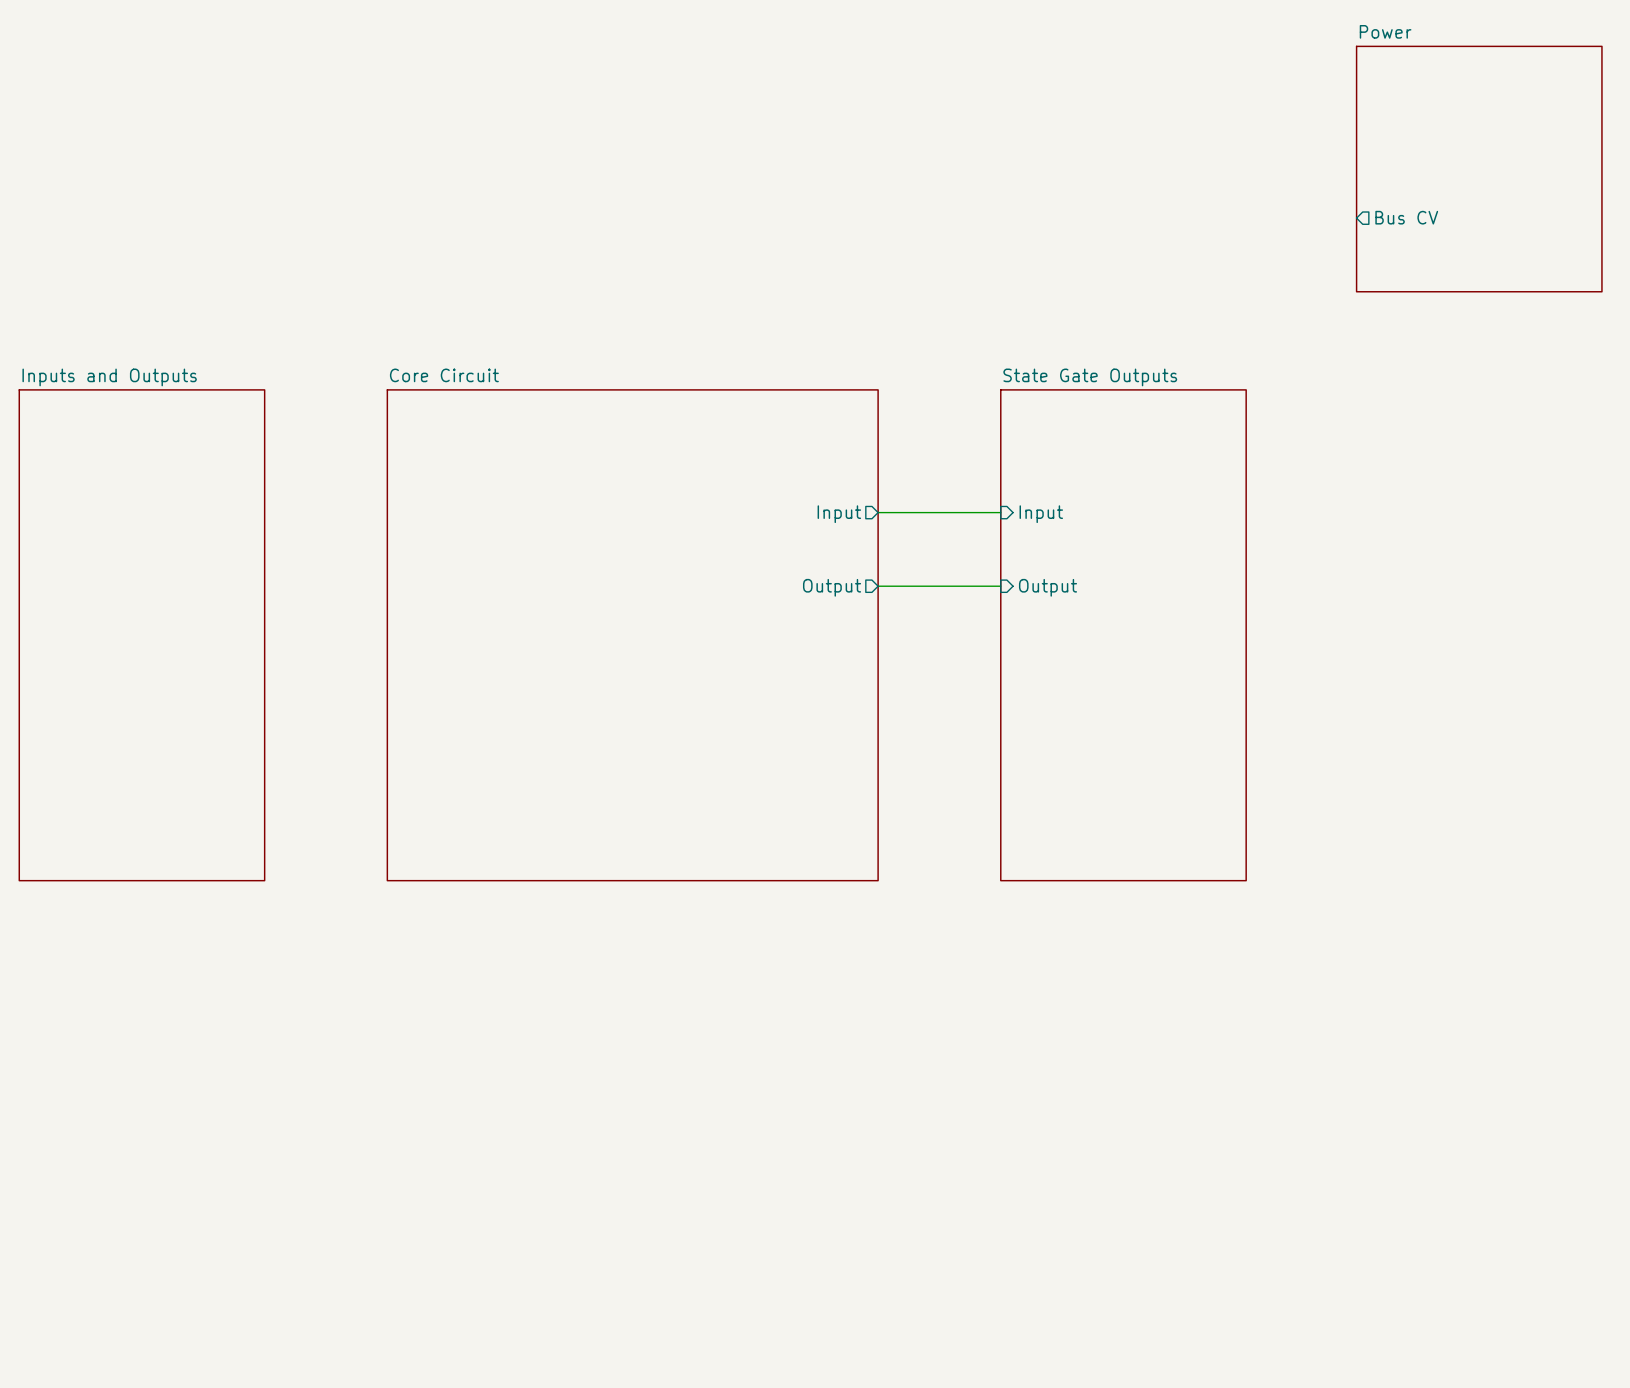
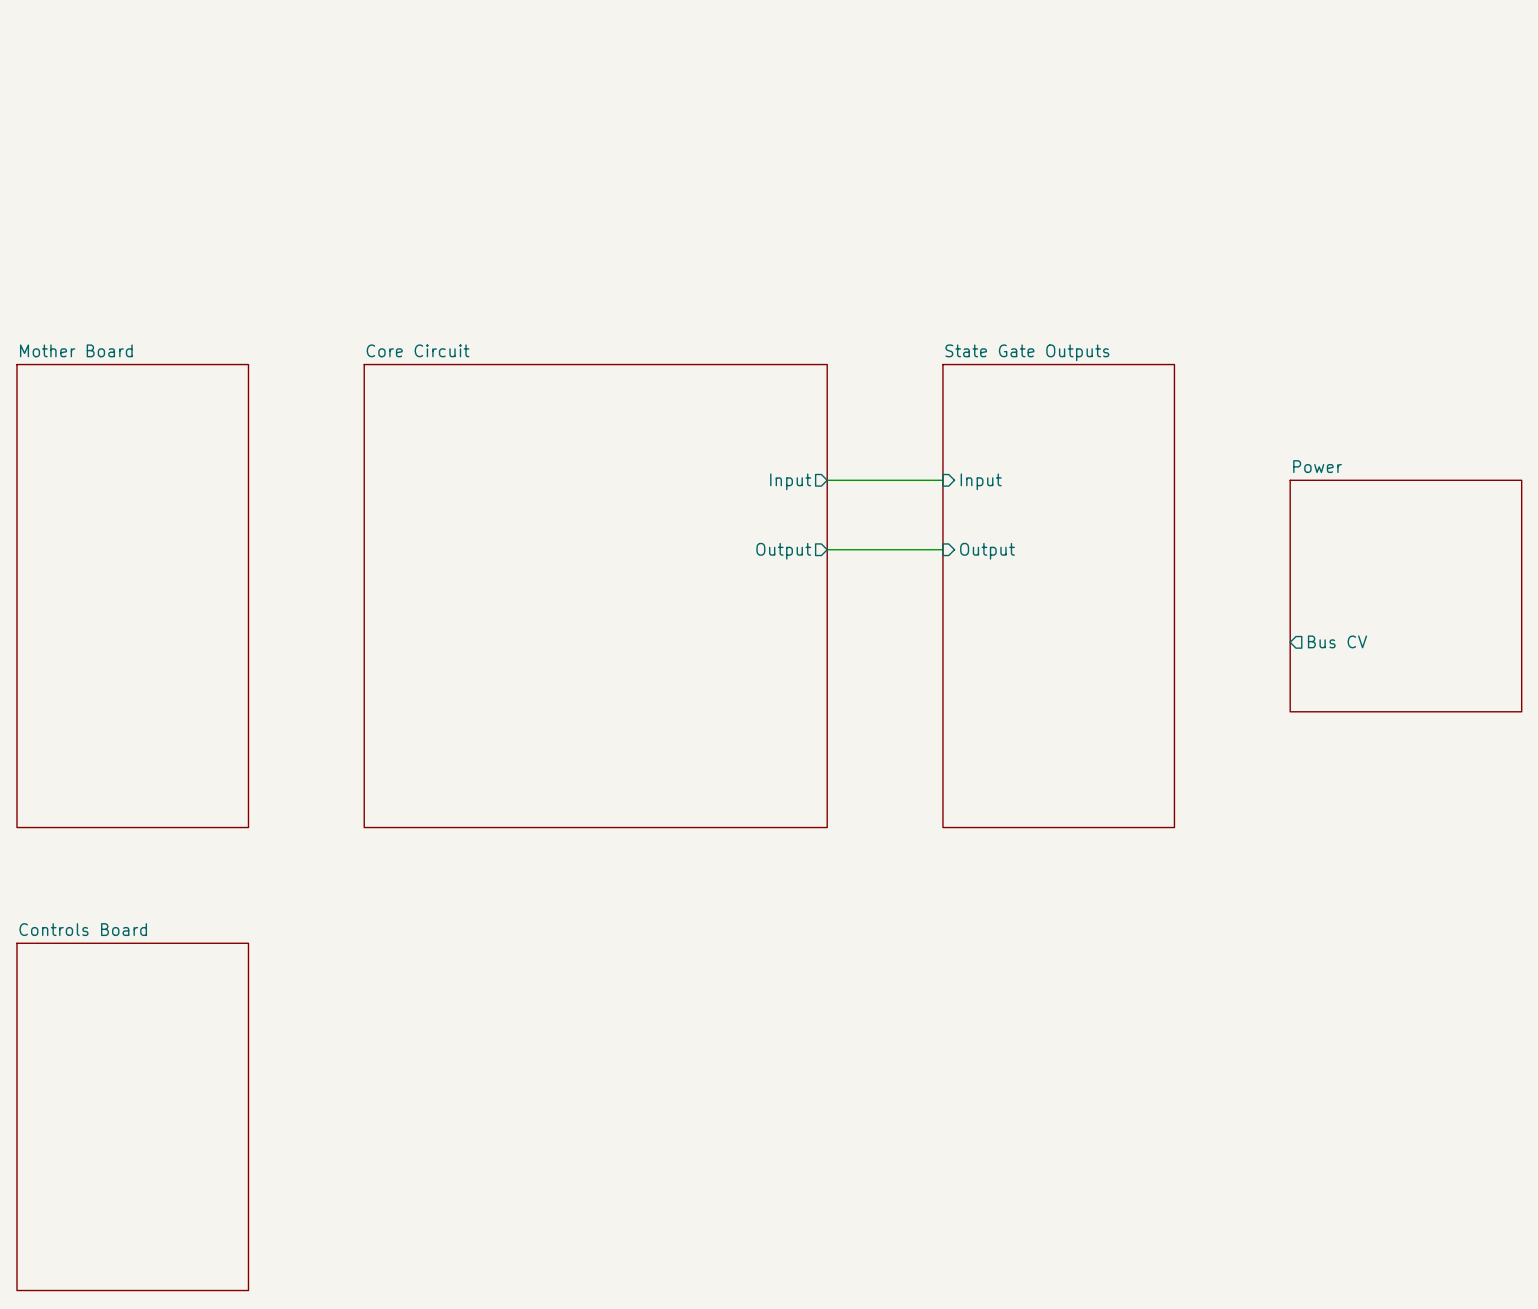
sheet Power: (1479, 169) -> none
sheet pin: Bus CV (1406, 217) -> none
sheet Inputs and Outputs name: Inputs and Outputs (109, 377) -> Mother Board (76, 350)
sheet Power: none -> (1405, 596)
sheet pin: none -> Bus CV (1337, 641)
sheet Controls Board: none -> (132, 1116)

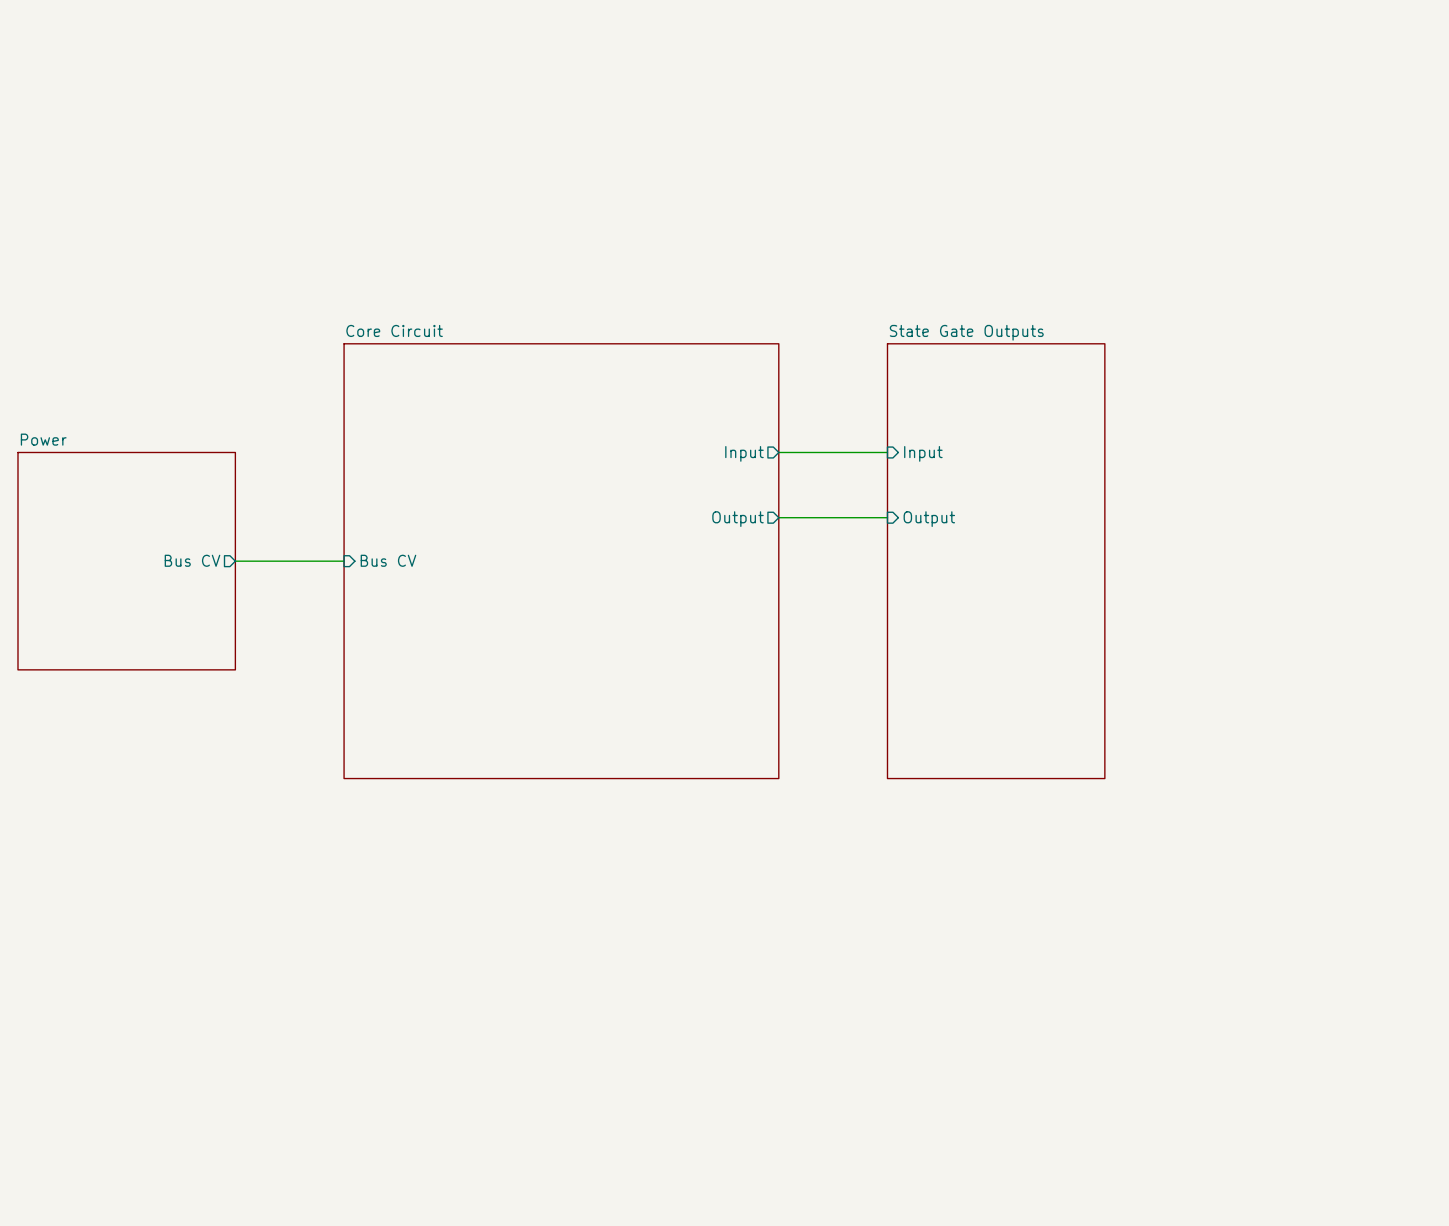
sheet pin: none -> Bus CV (192, 560)
sheet pin: none -> Bus CV (388, 560)
sheet Mother Board: (132, 596) -> none
sheet Power: none -> (126, 561)
wire: none -> (235, 561) (344, 561)
sheet Power: (1405, 596) -> none
sheet pin: Bus CV (1337, 641) -> none
sheet Controls Board: (132, 1116) -> none

